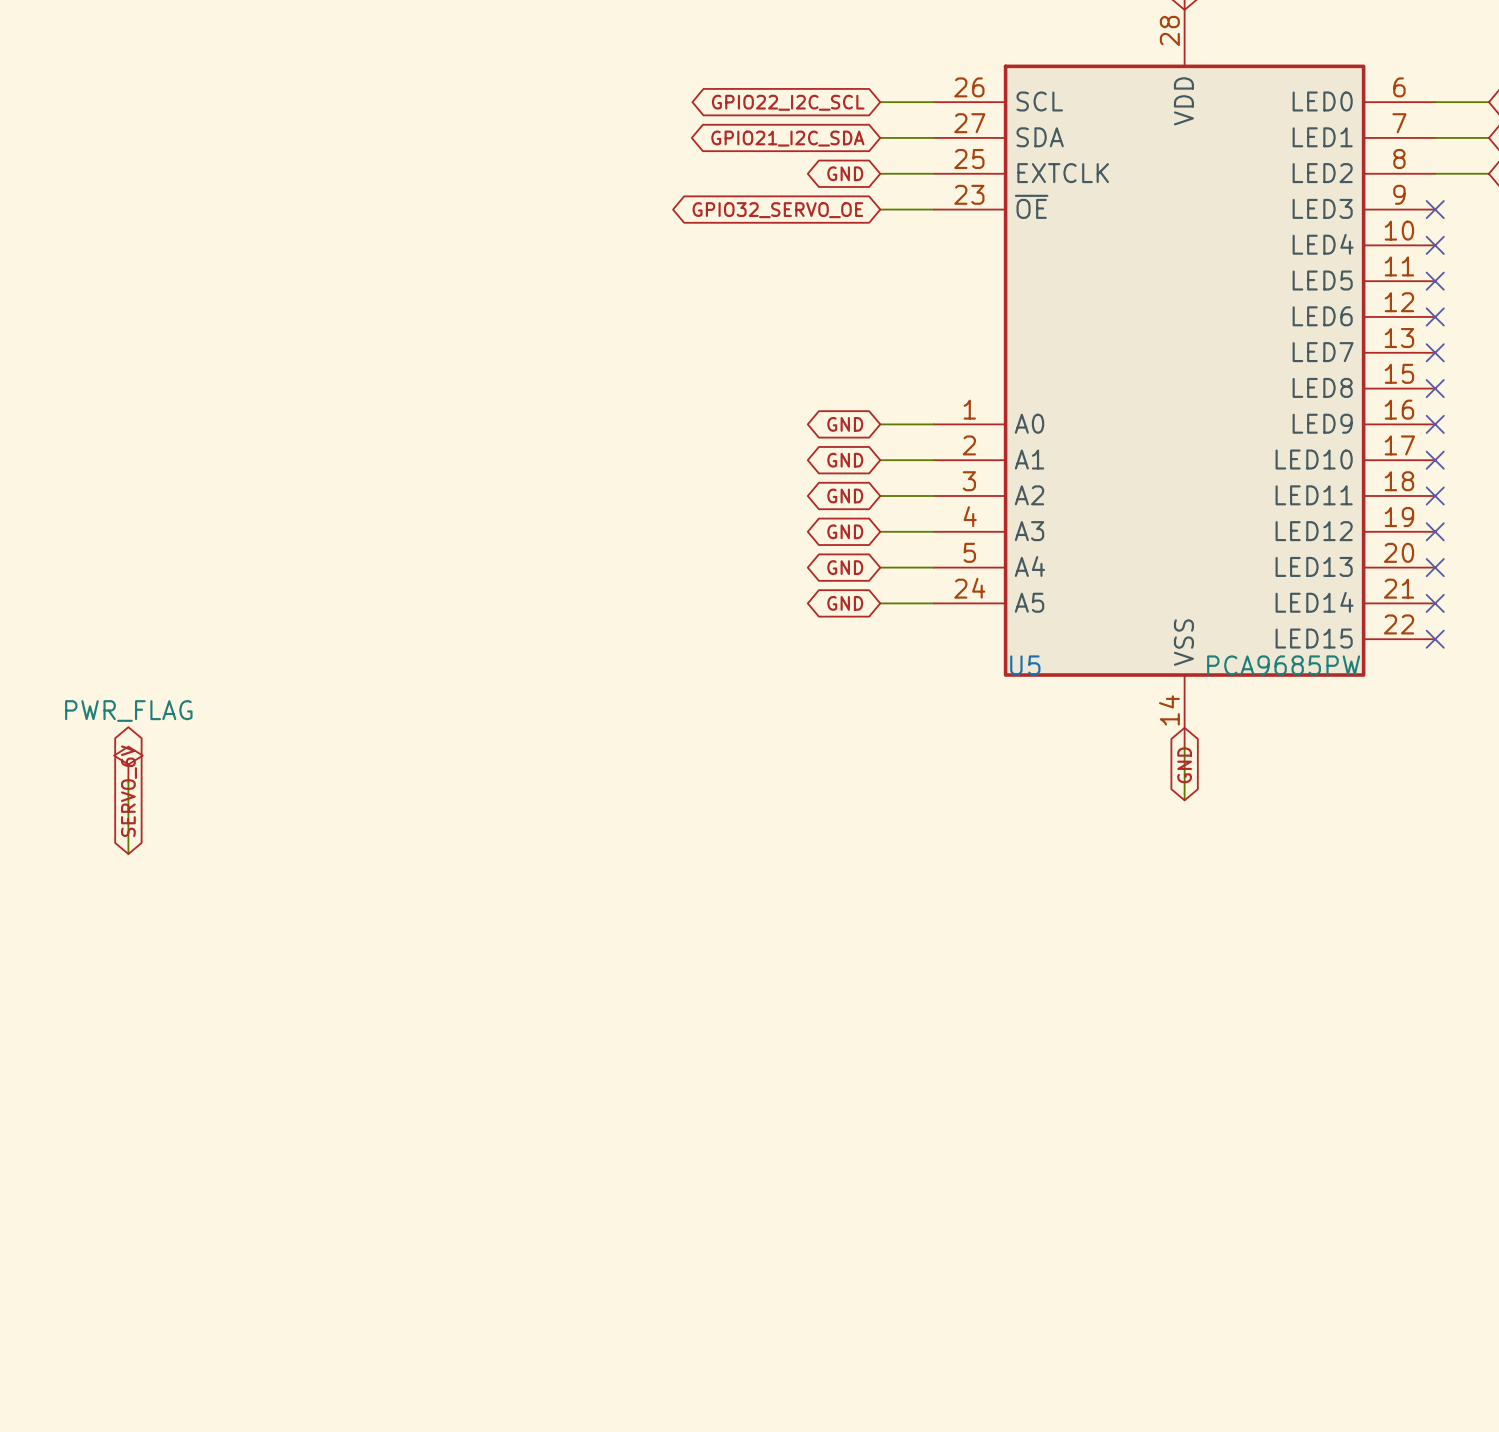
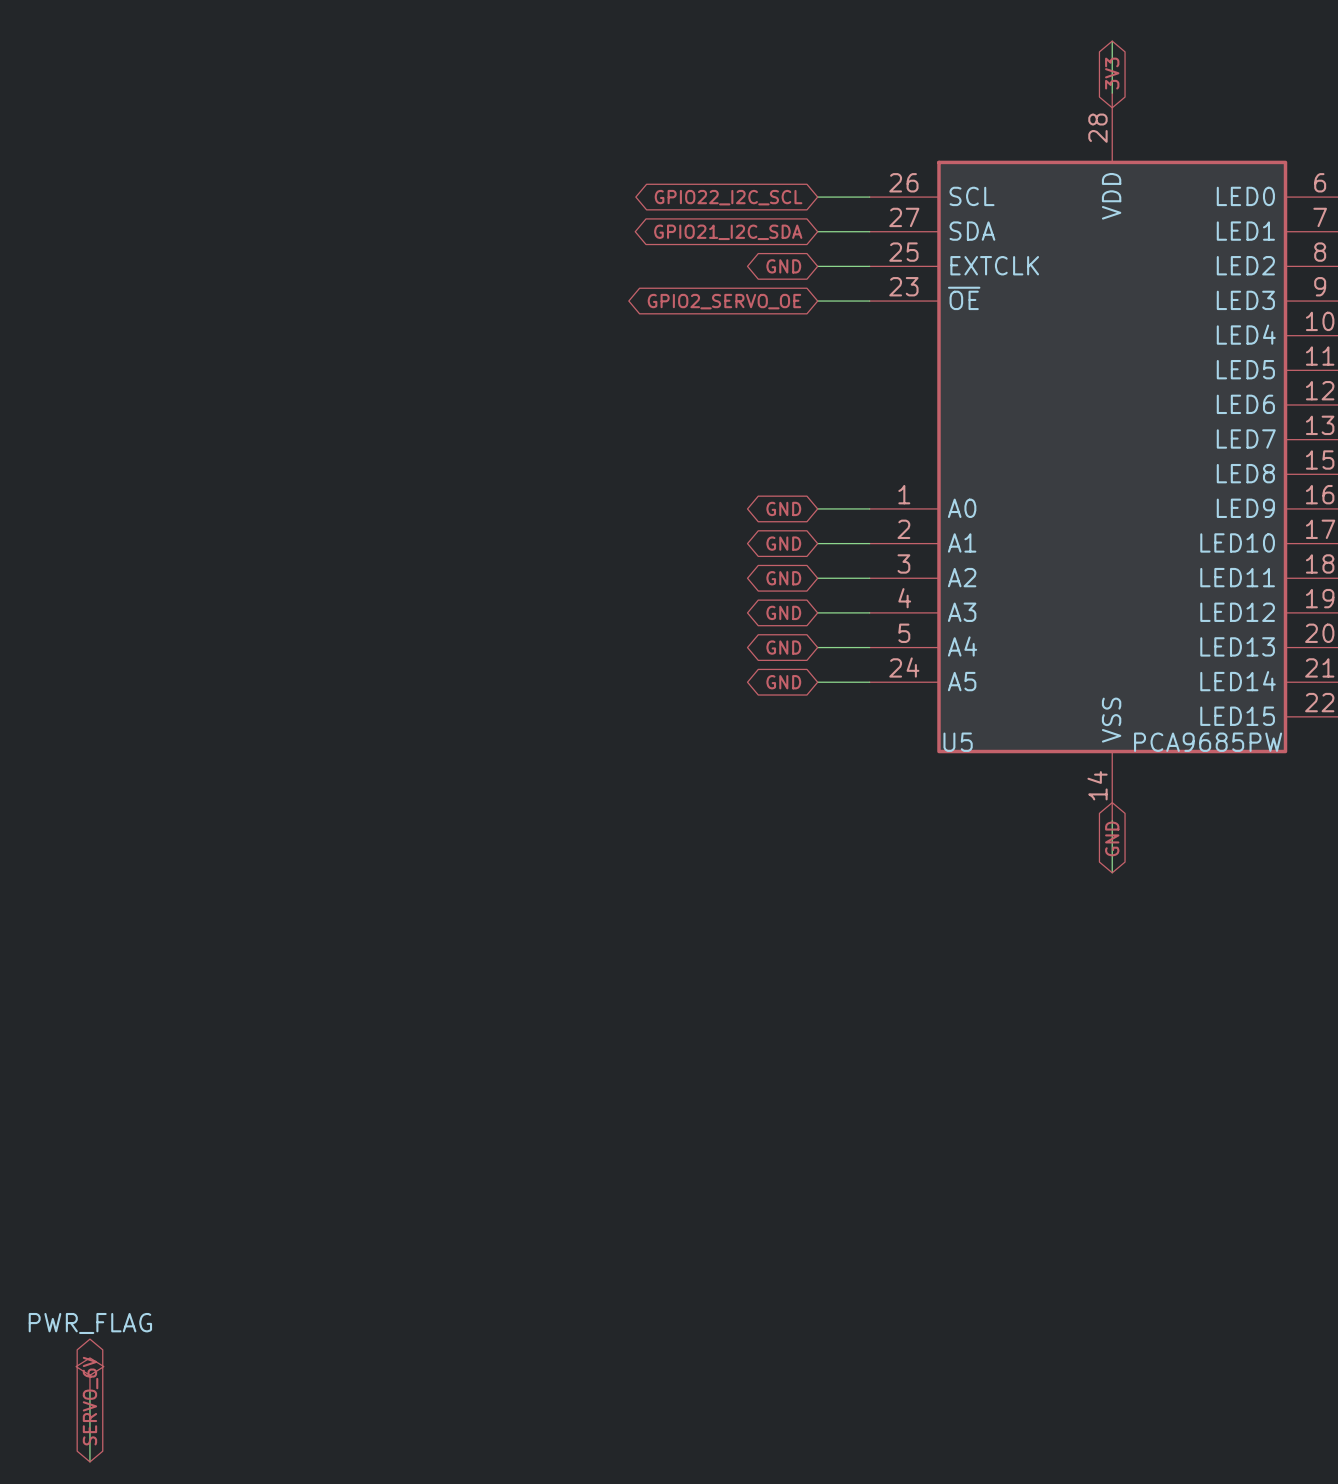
global label: GPIO32_SERVO_OE (777, 210) -> GPIO2_SERVO_OE (724, 301)
power symbol: PWR_FLAG (128, 764) -> none
wire: (128, 782) (128, 854) -> none
global label: SERVO_6V (129, 791) -> none
power symbol: none -> PWR_FLAG (89, 1375)
wire: none -> (89, 1392) (89, 1461)
global label: none -> SERVO_6V (90, 1401)

